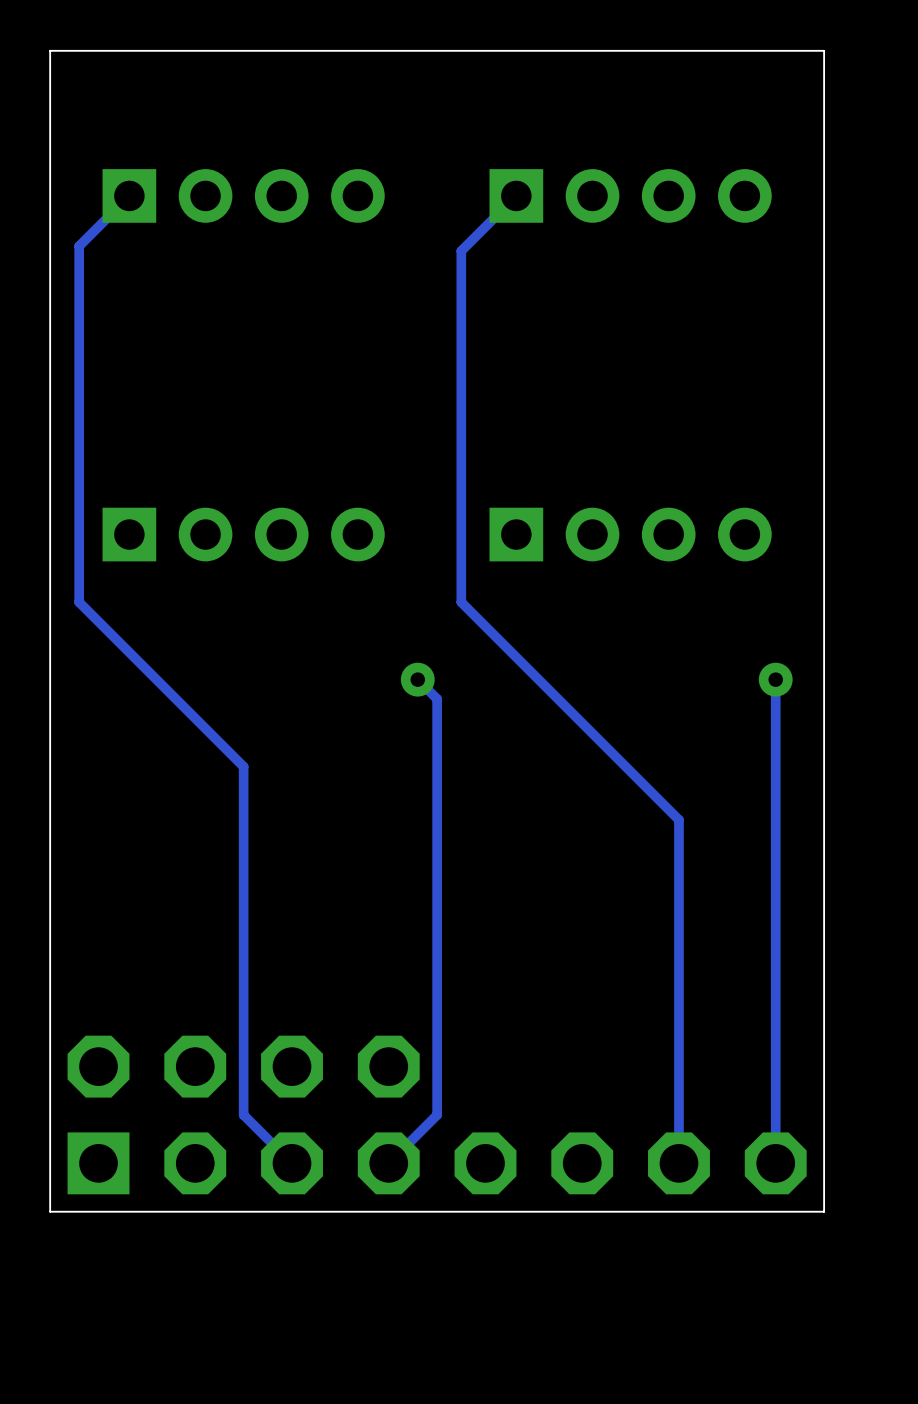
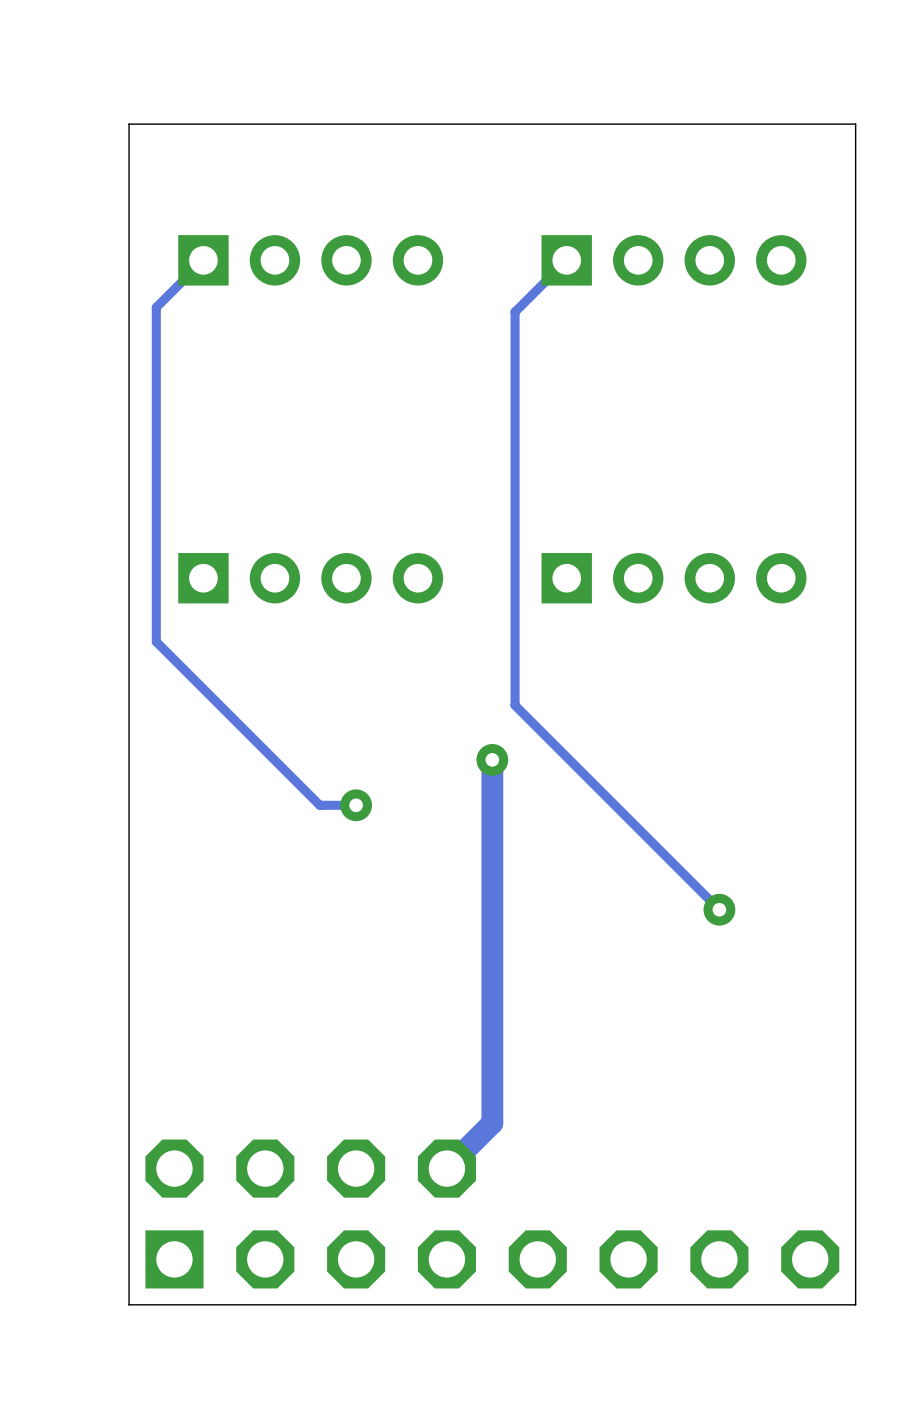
track: (461, 602) (678, 819) (678, 1163) -> (515, 641) (515, 705) (719, 909)
track: (417, 679) (437, 699) (437, 728) -> none
via position: (417, 679) -> (492, 759)
track: (775, 679) (775, 1163) -> none
via: (775, 679) -> none
track width: thin (437, 728) (437, 1114) (388, 1163) -> thick (492, 759) (492, 1123) (446, 1168)
track: (243, 766) (243, 1114) (292, 1163) -> (310, 796) (319, 805) (356, 805)
via: none -> (356, 805)
via: none -> (719, 909)
part position: (437, 1114) -> (492, 1214)
board edge: (824, 1211) (50, 1211) -> (855, 1214) (855, 1304) (129, 1304) (129, 1214)

